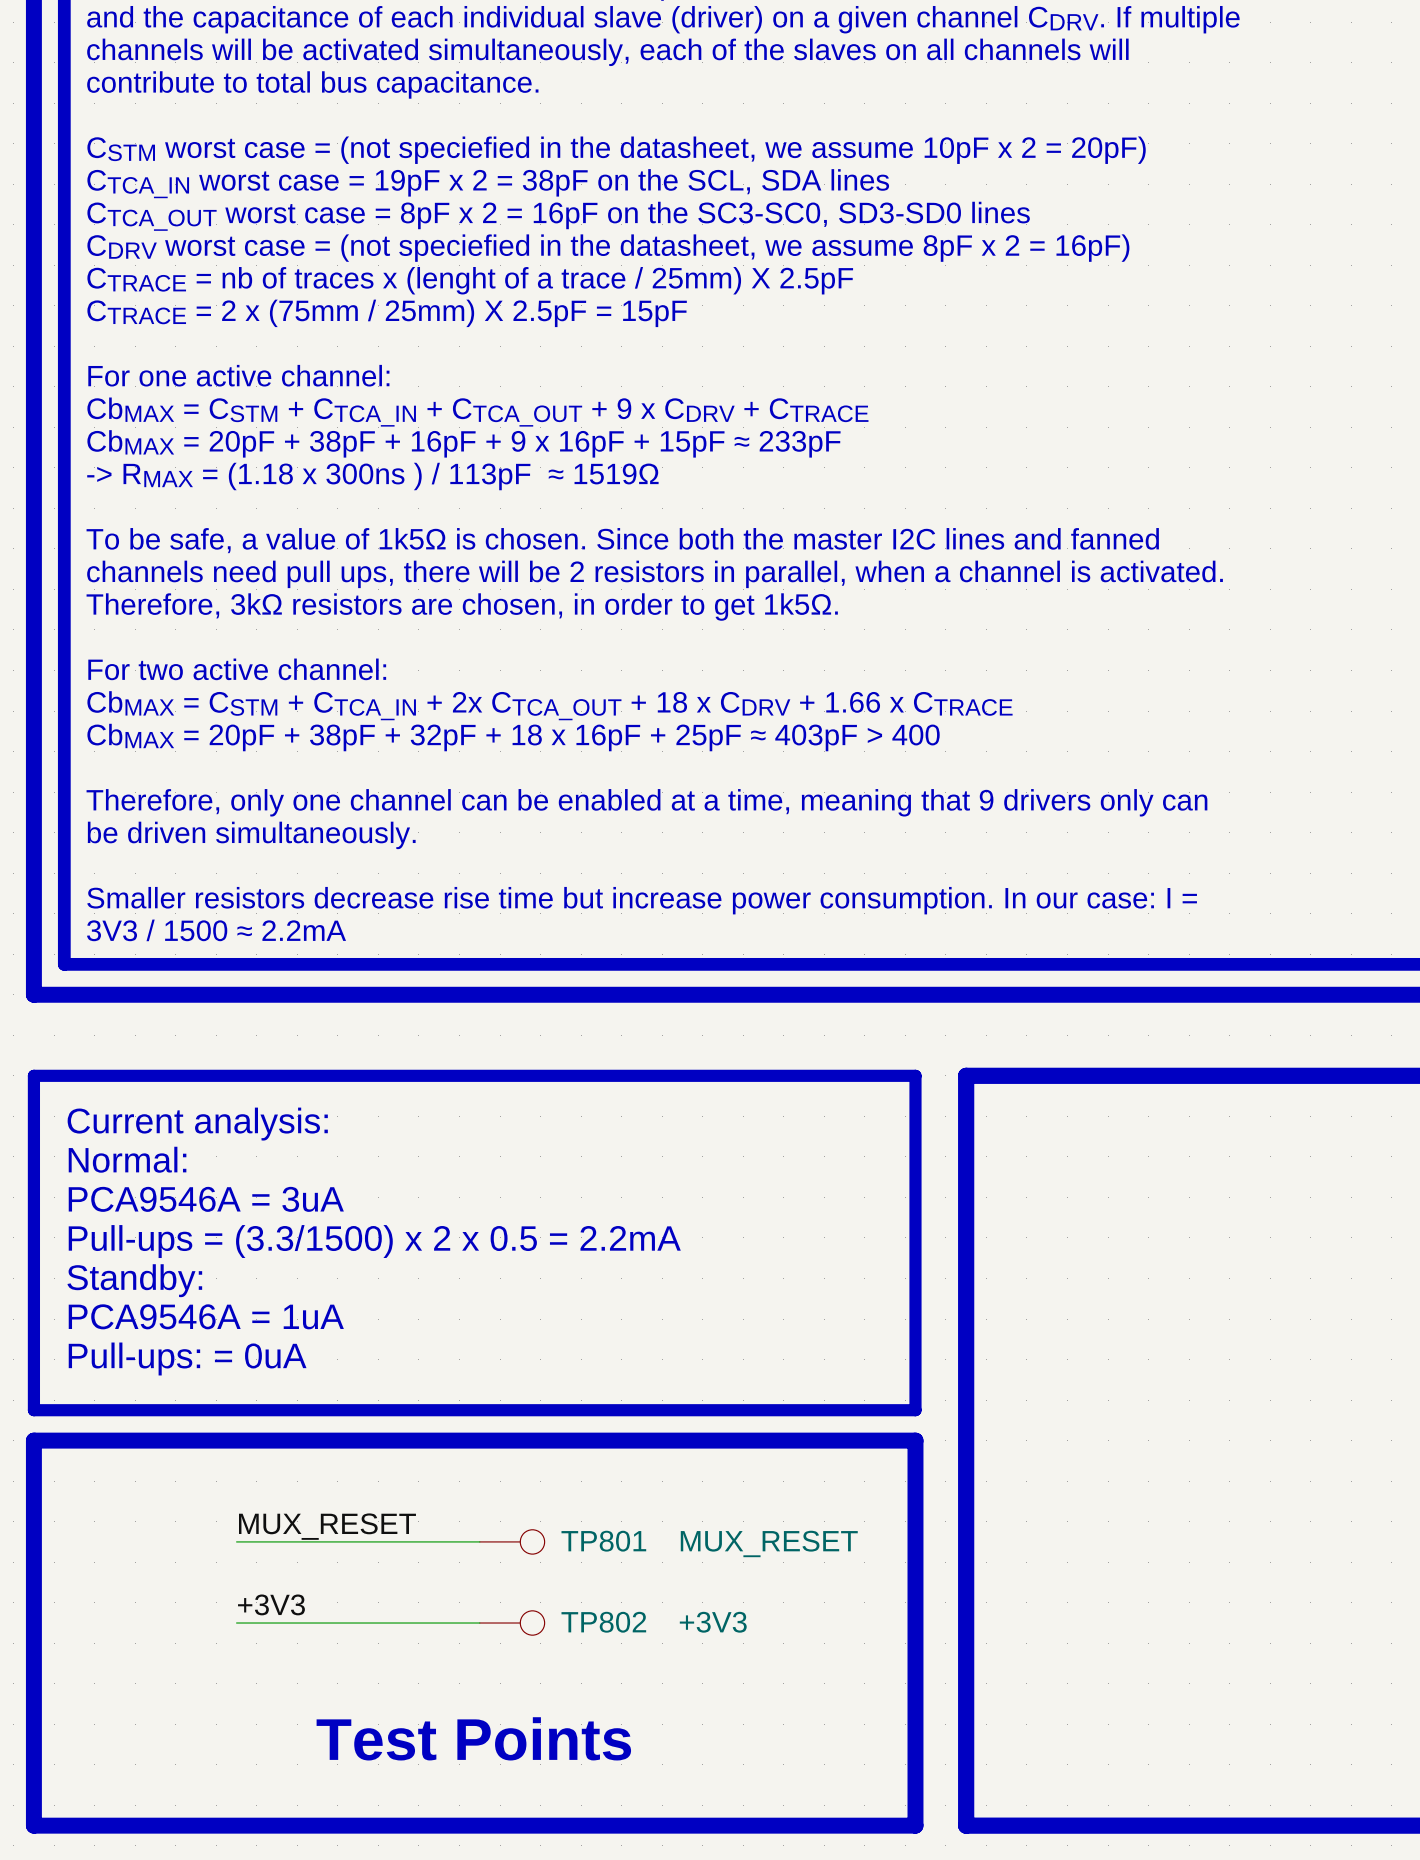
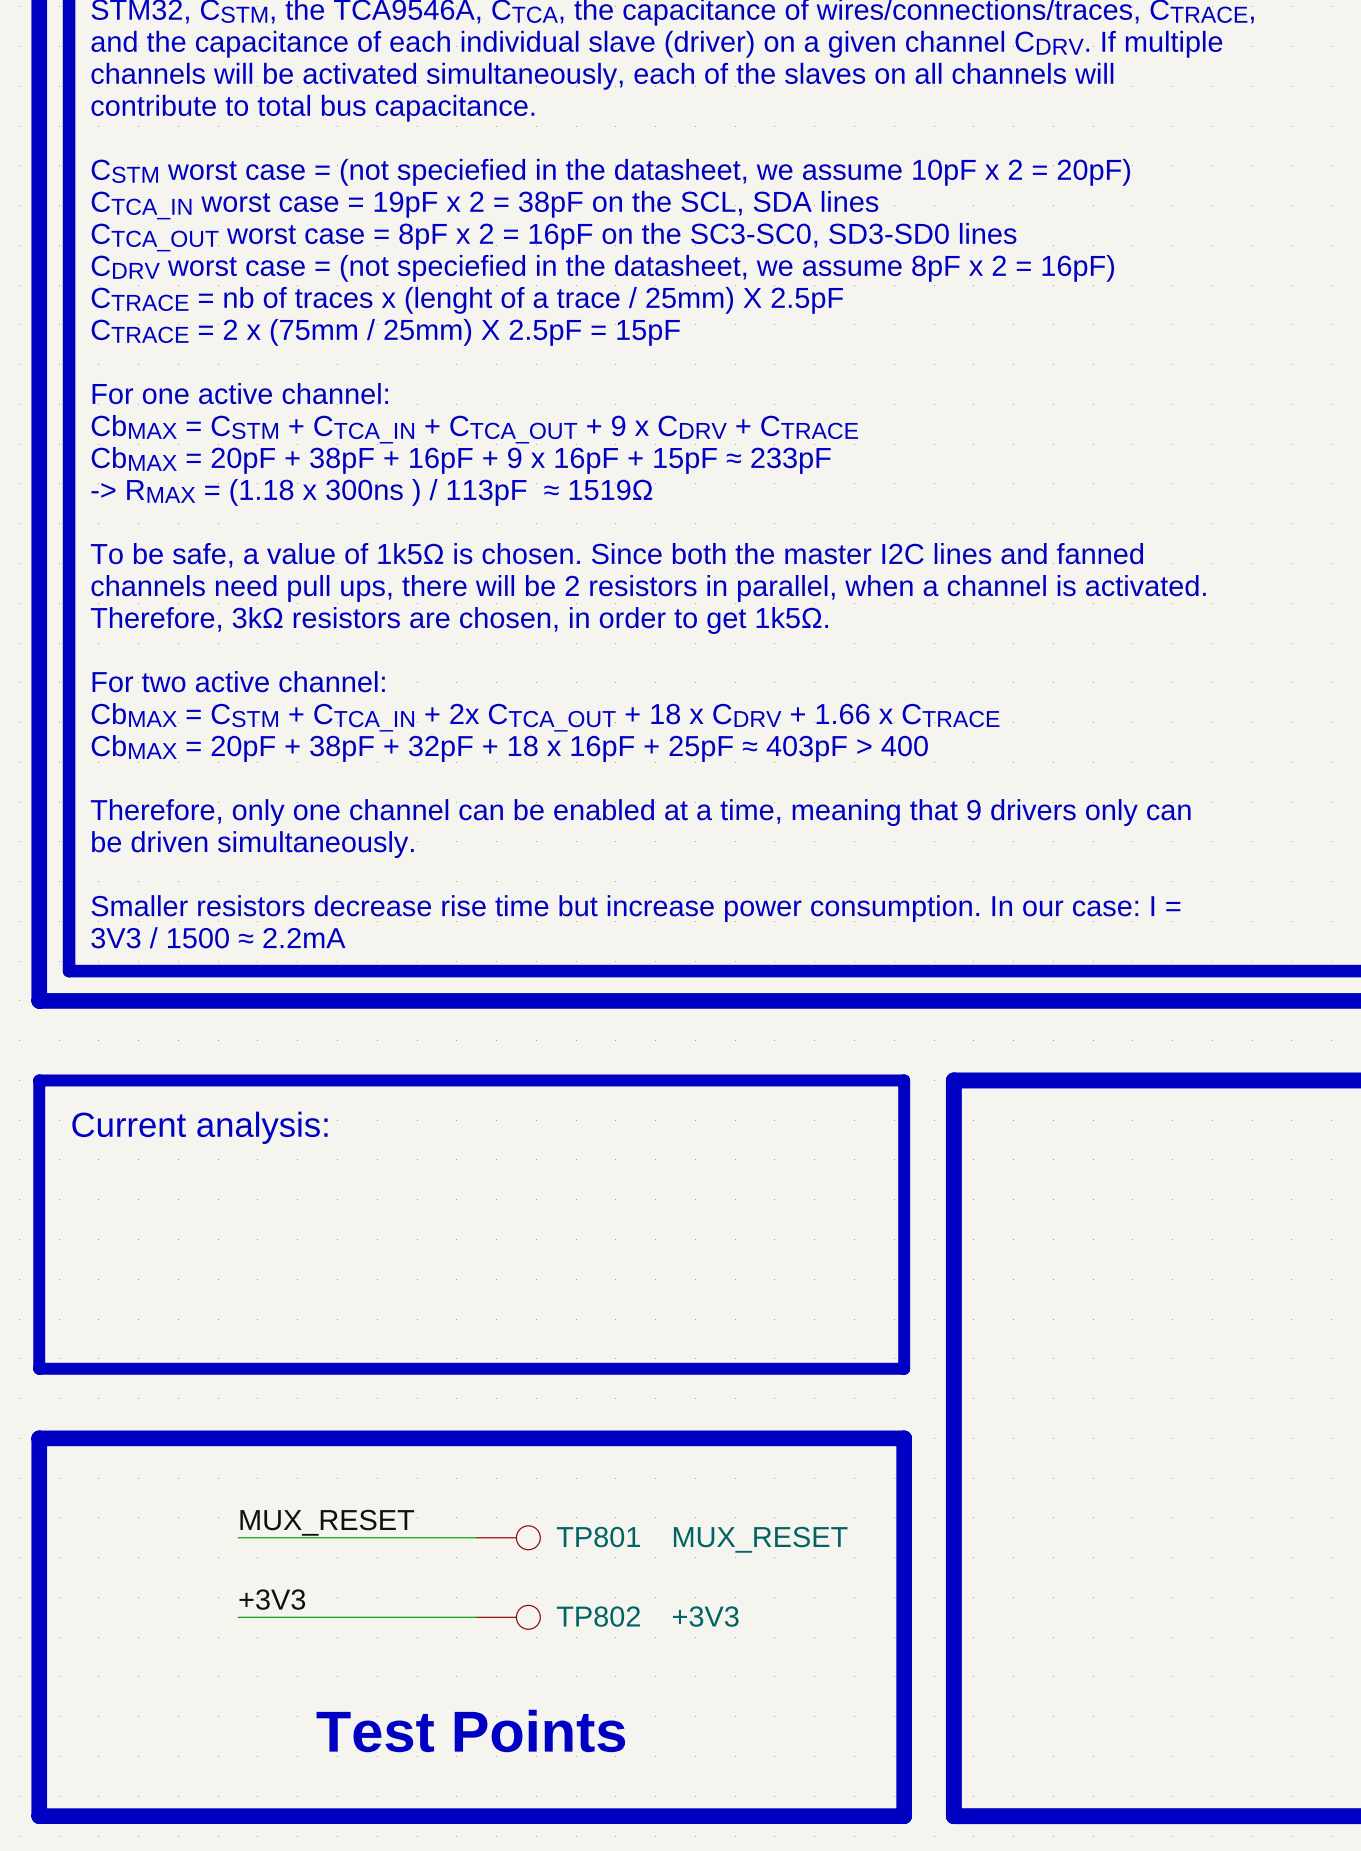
text: Normal: (127, 1159) -> none
text: PCA9546A = 3uA (206, 1199) -> none
text: Pull-ups = (3.3/1500) x 2 x 0.5 = 2.2mA (374, 1241) -> none
text: Standby: (134, 1280) -> none
text: PCA9546A = 1uA (206, 1316) -> none
text: Pull-ups: = 0uA (187, 1359) -> none
line: (33, 1369) (33, 1410) (915, 1410) (915, 1369) -> (39, 1368) (904, 1368)

